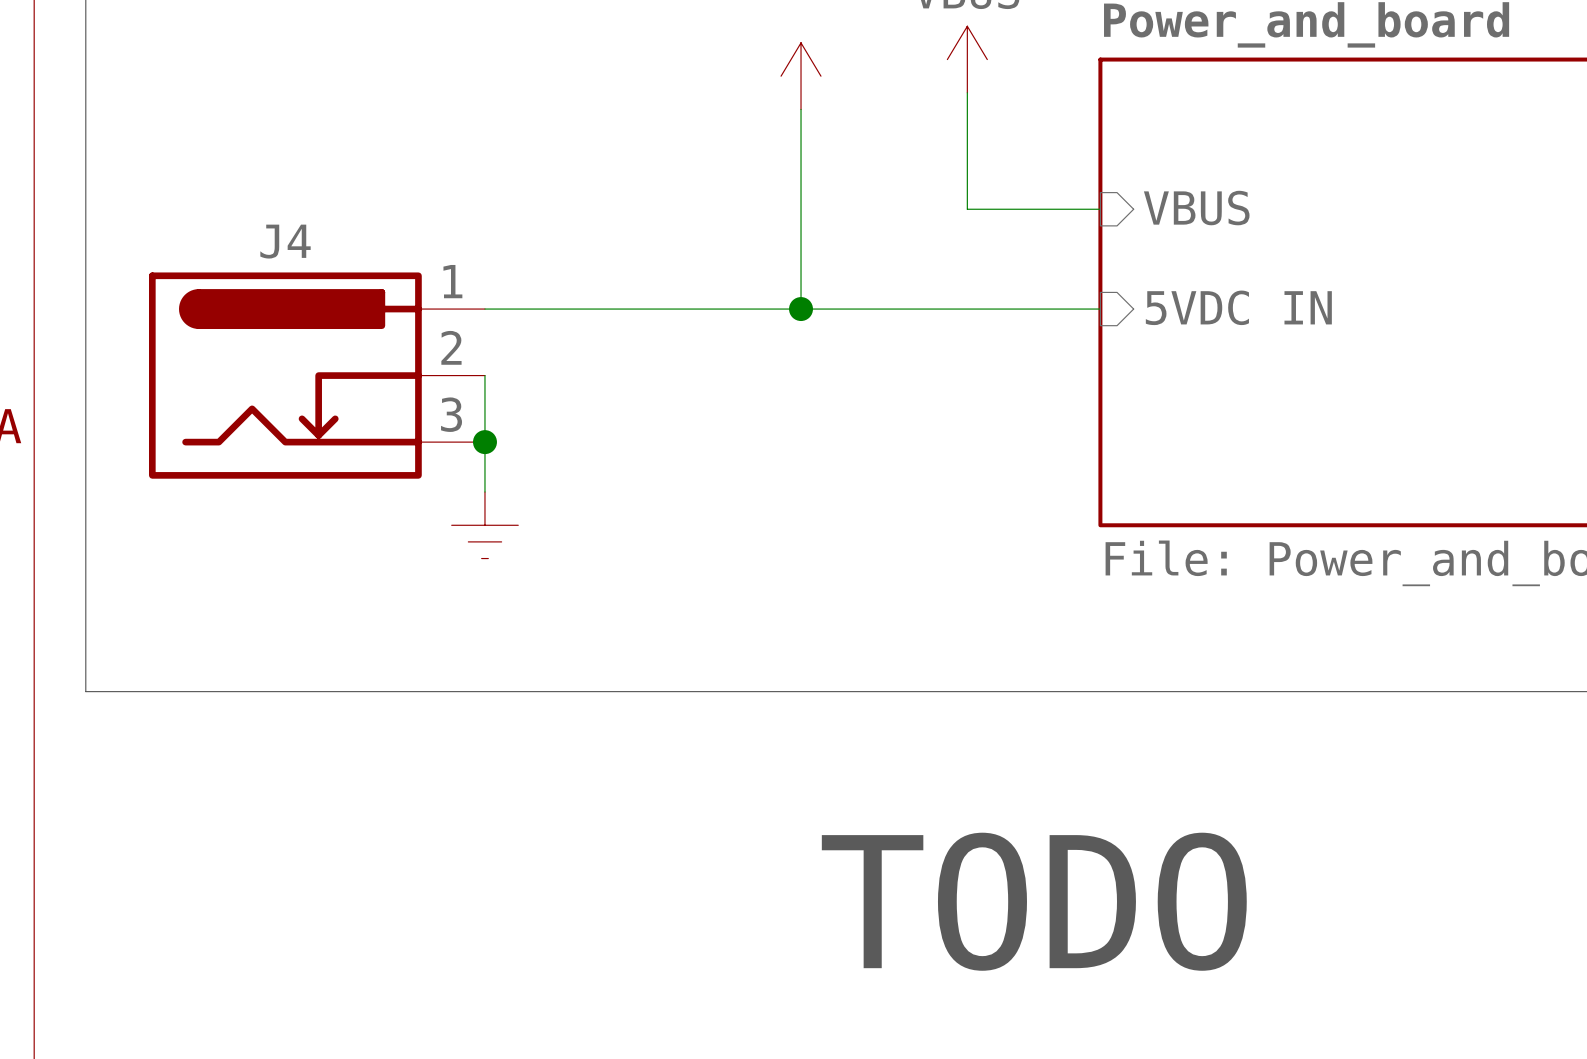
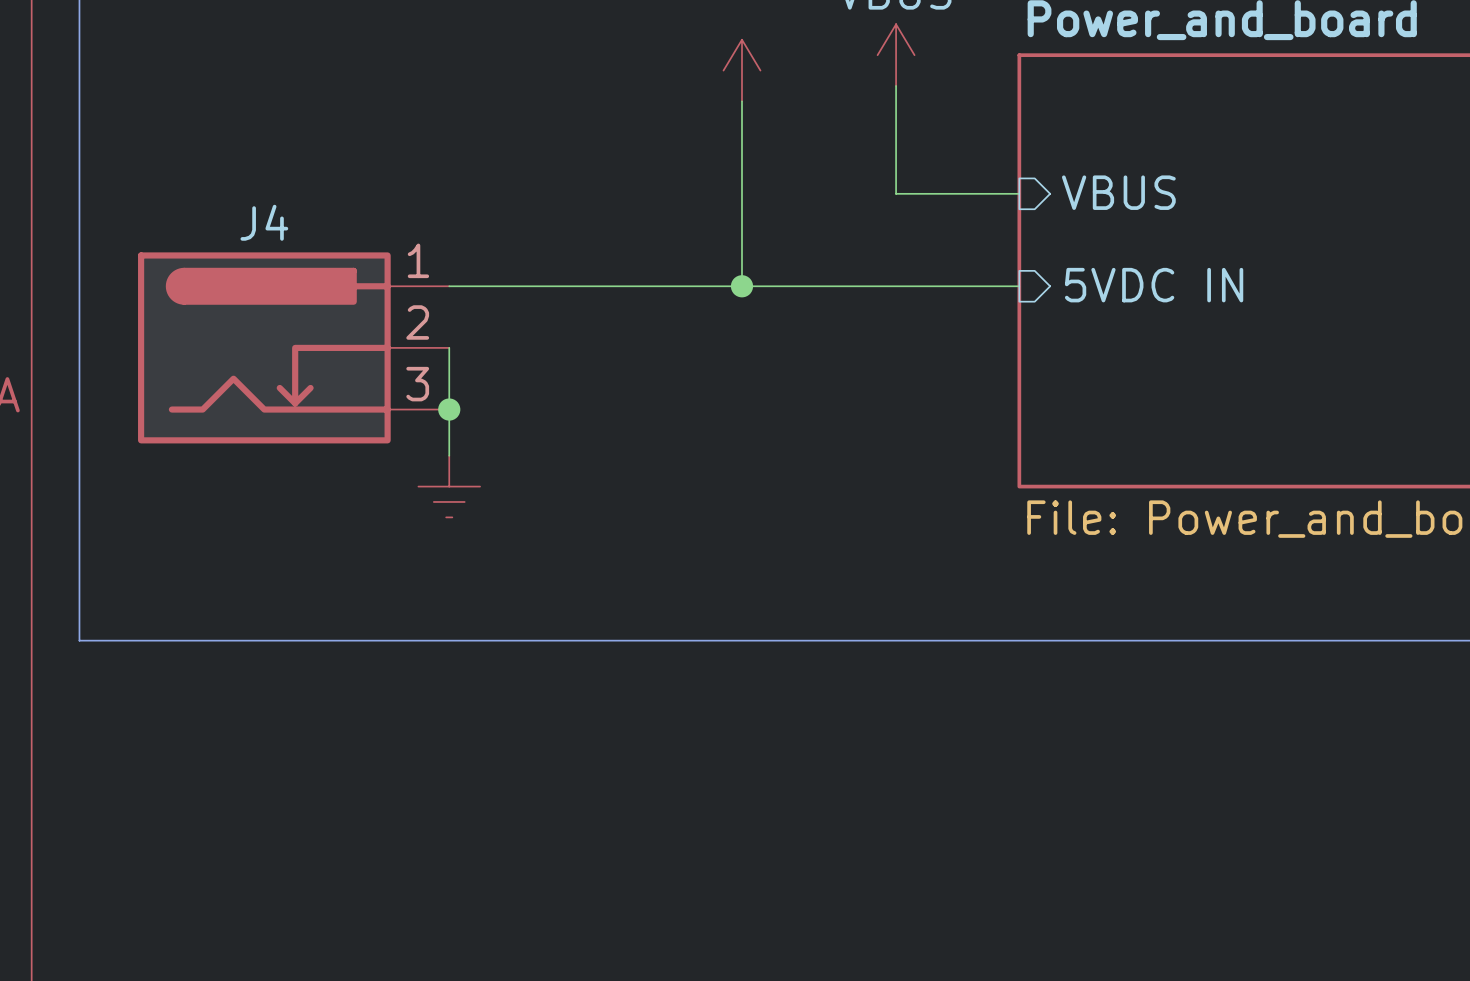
text: TODO (1034, 901) -> none

